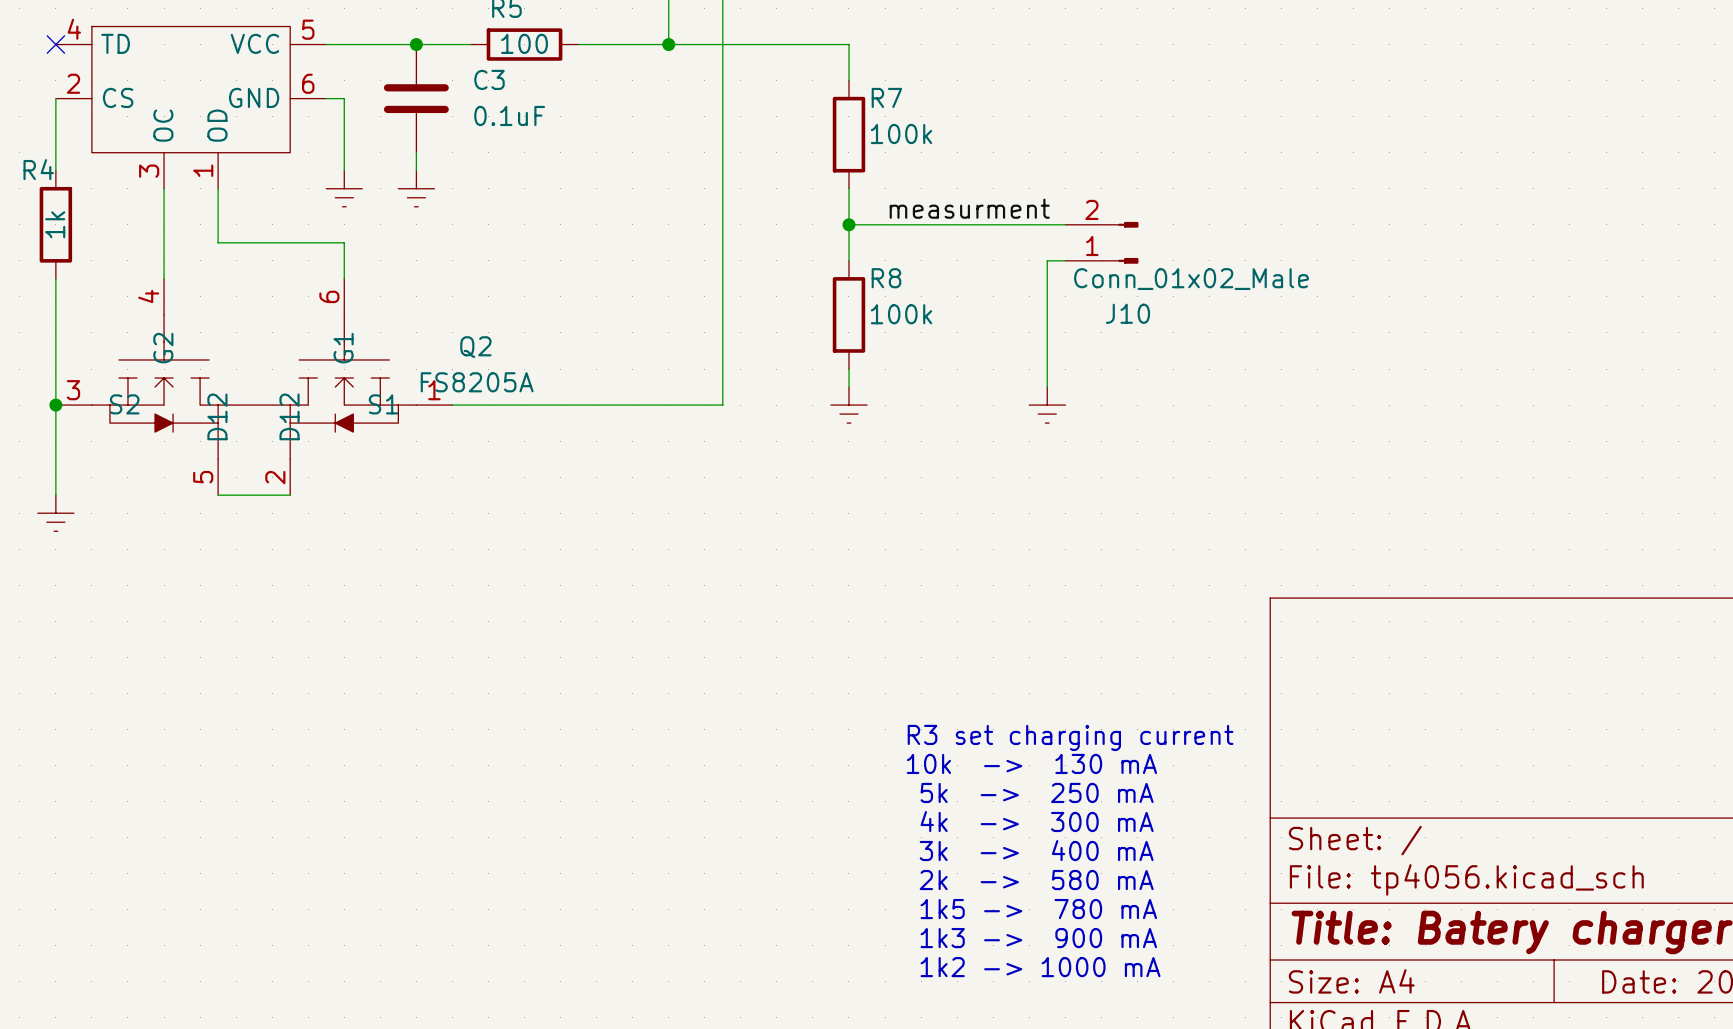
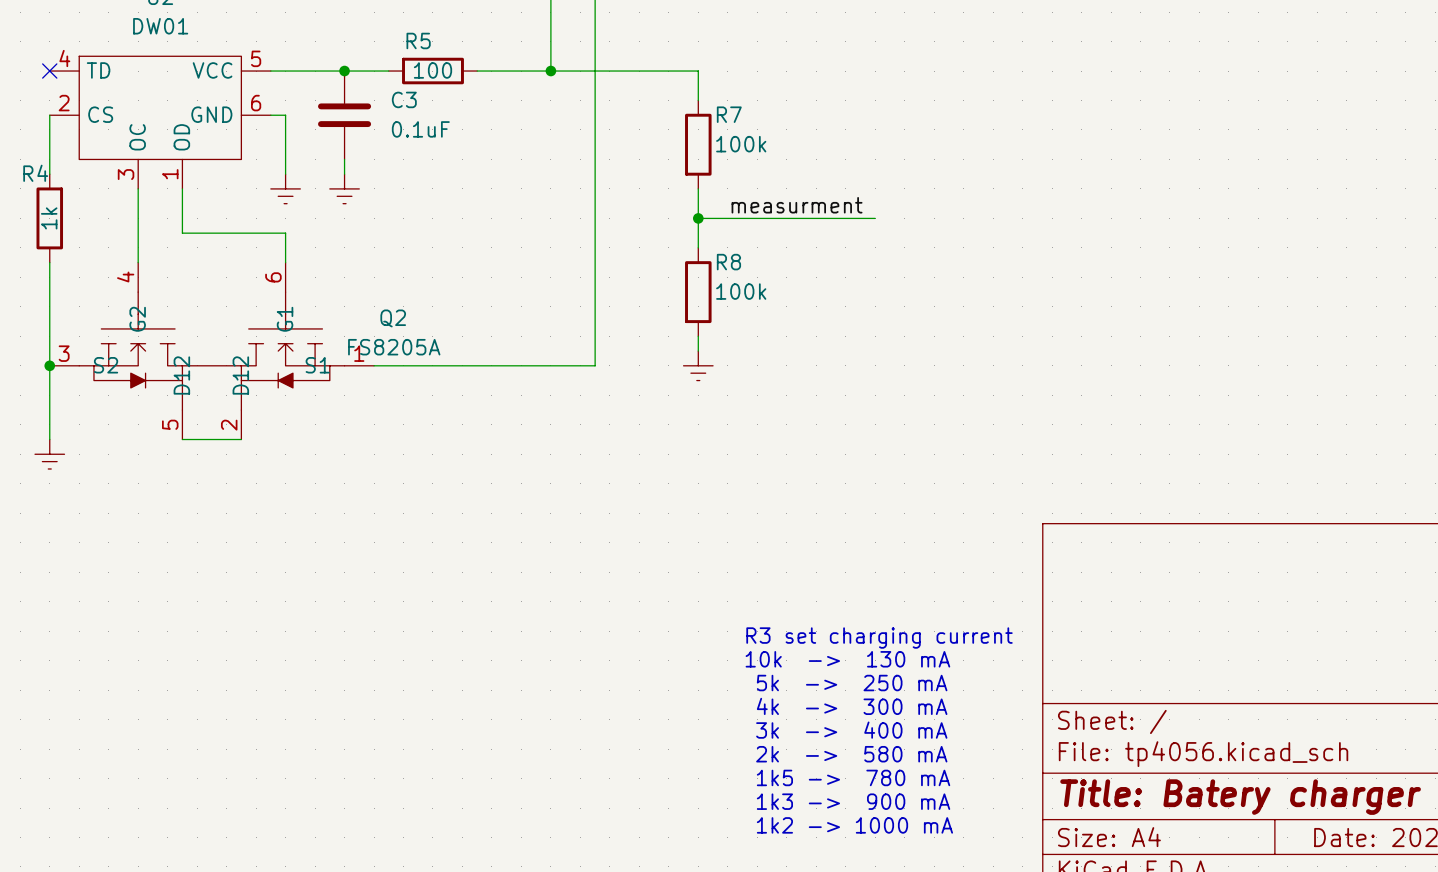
J10: Conn_01x02_Male (1101, 242) -> none
wire: (1065, 260) (1047, 260) (1047, 387) -> none
power symbol: (1047, 405) -> none

